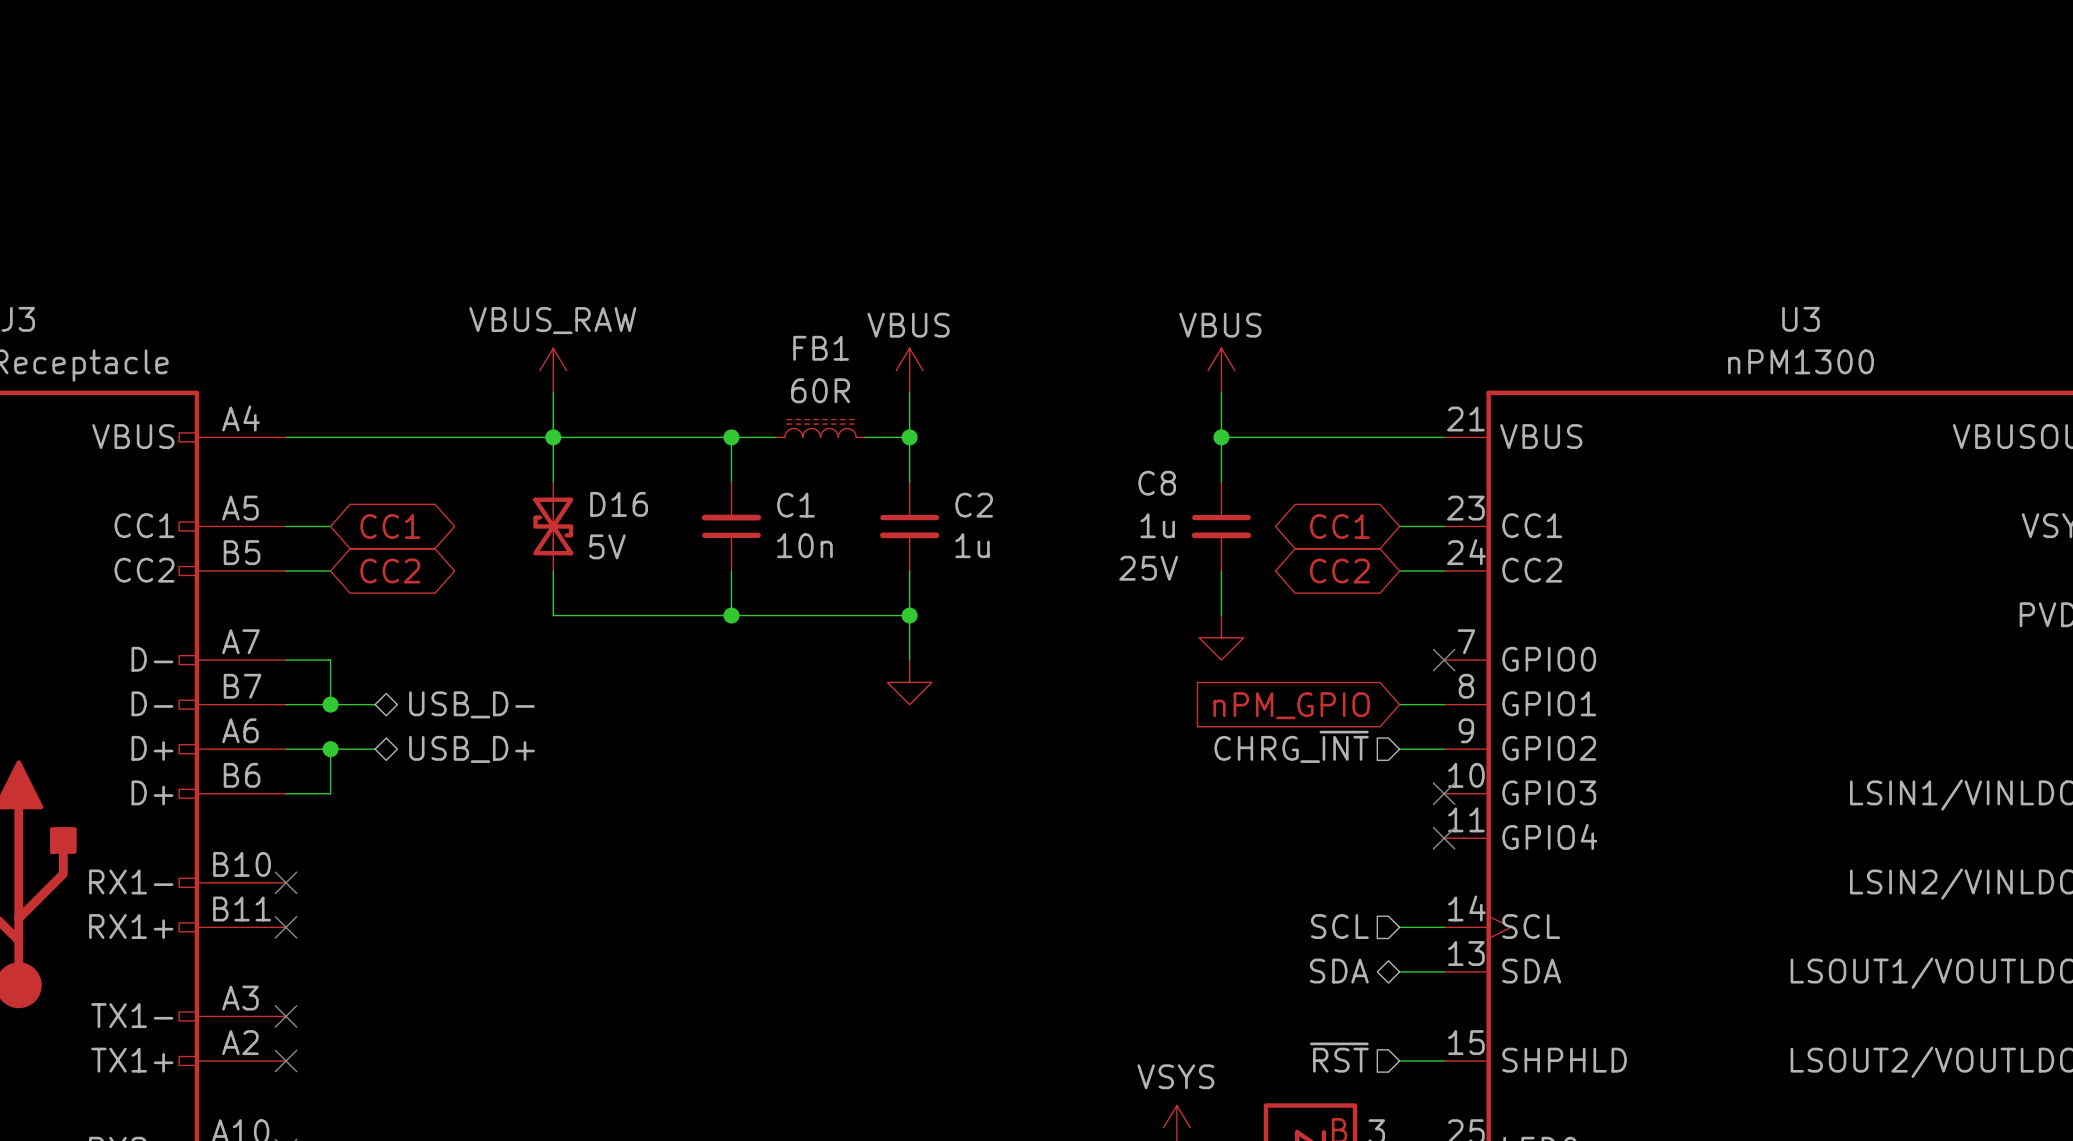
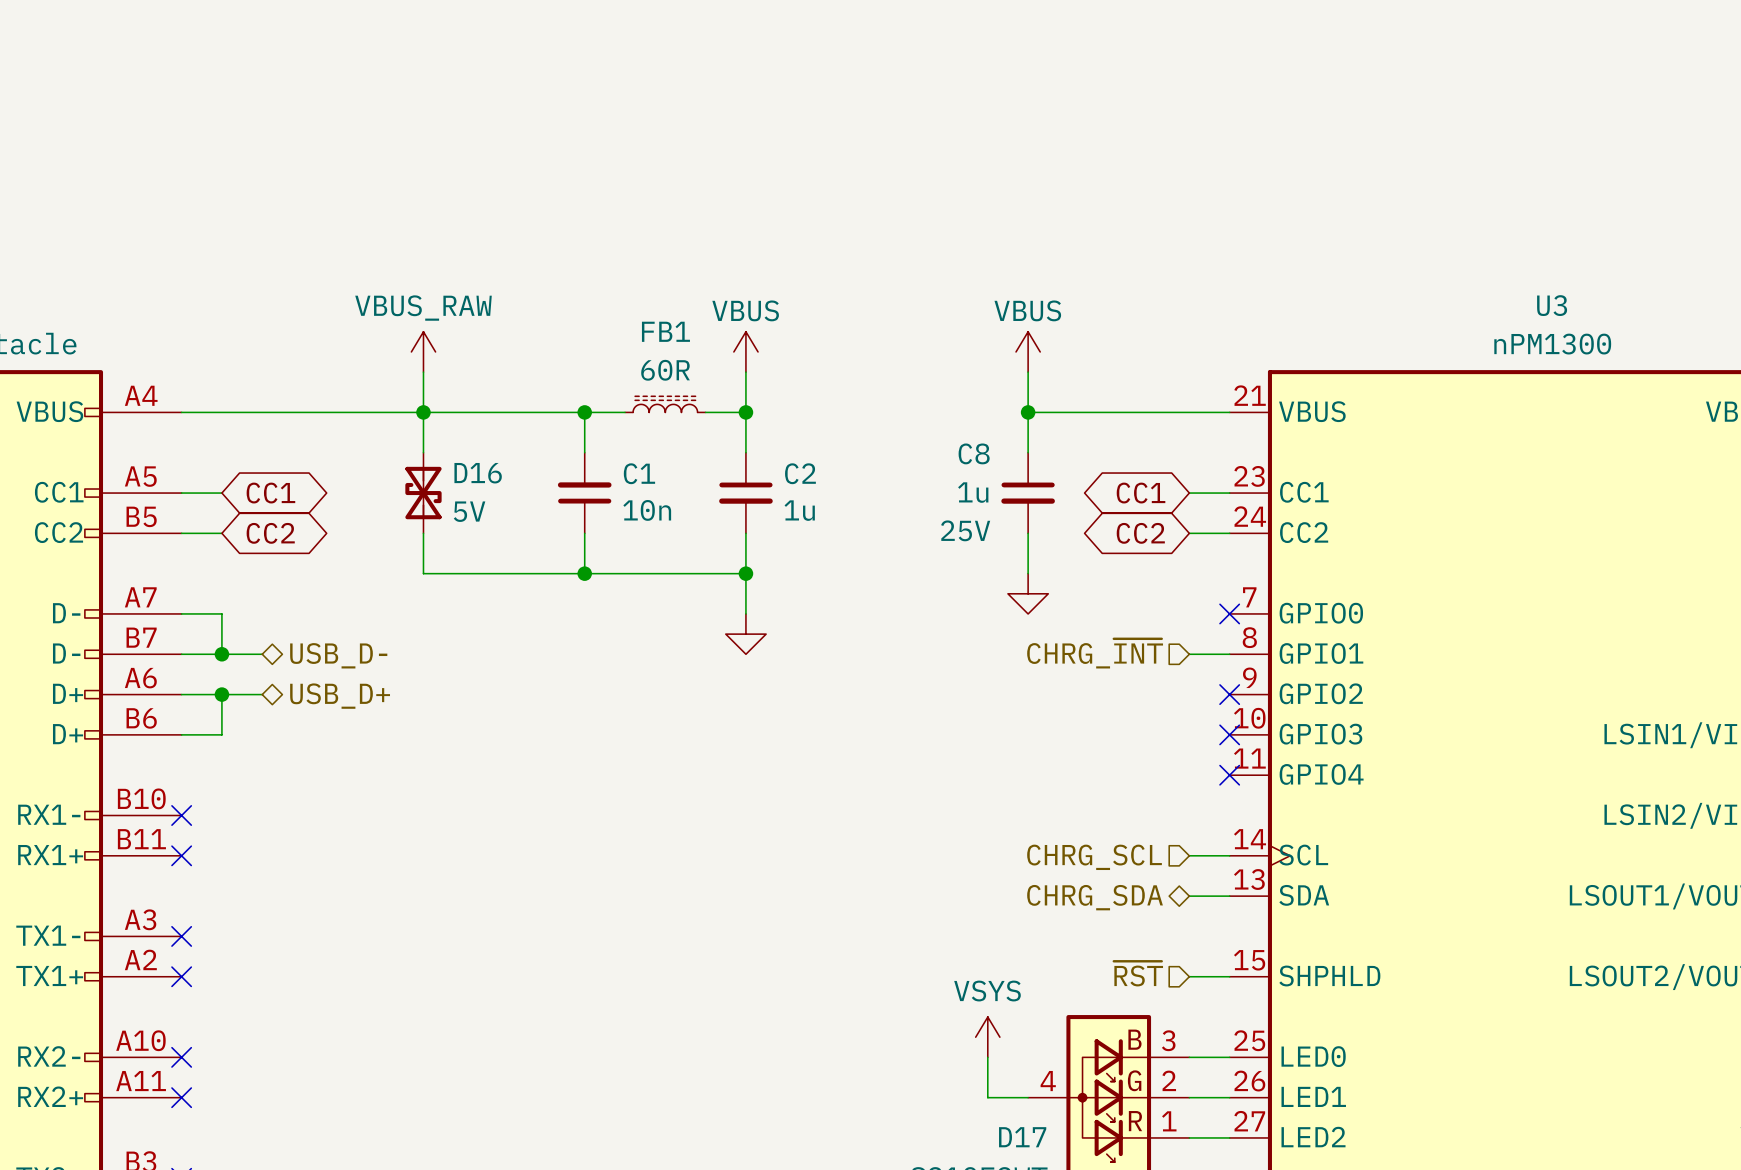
global label: nPM_GPIO (1291, 705) -> none
hierarchical label position: CHRG_~{INT} (1291, 746) -> CHRG_~{INT} (1095, 653)
wire: (1399, 749) (1444, 749) -> none
no-connect mark: none -> (1229, 694)
hierarchical label: SCL (1339, 926) -> CHRG_SCL (1094, 857)
hierarchical label: SDA (1339, 971) -> CHRG_SDA (1095, 897)

